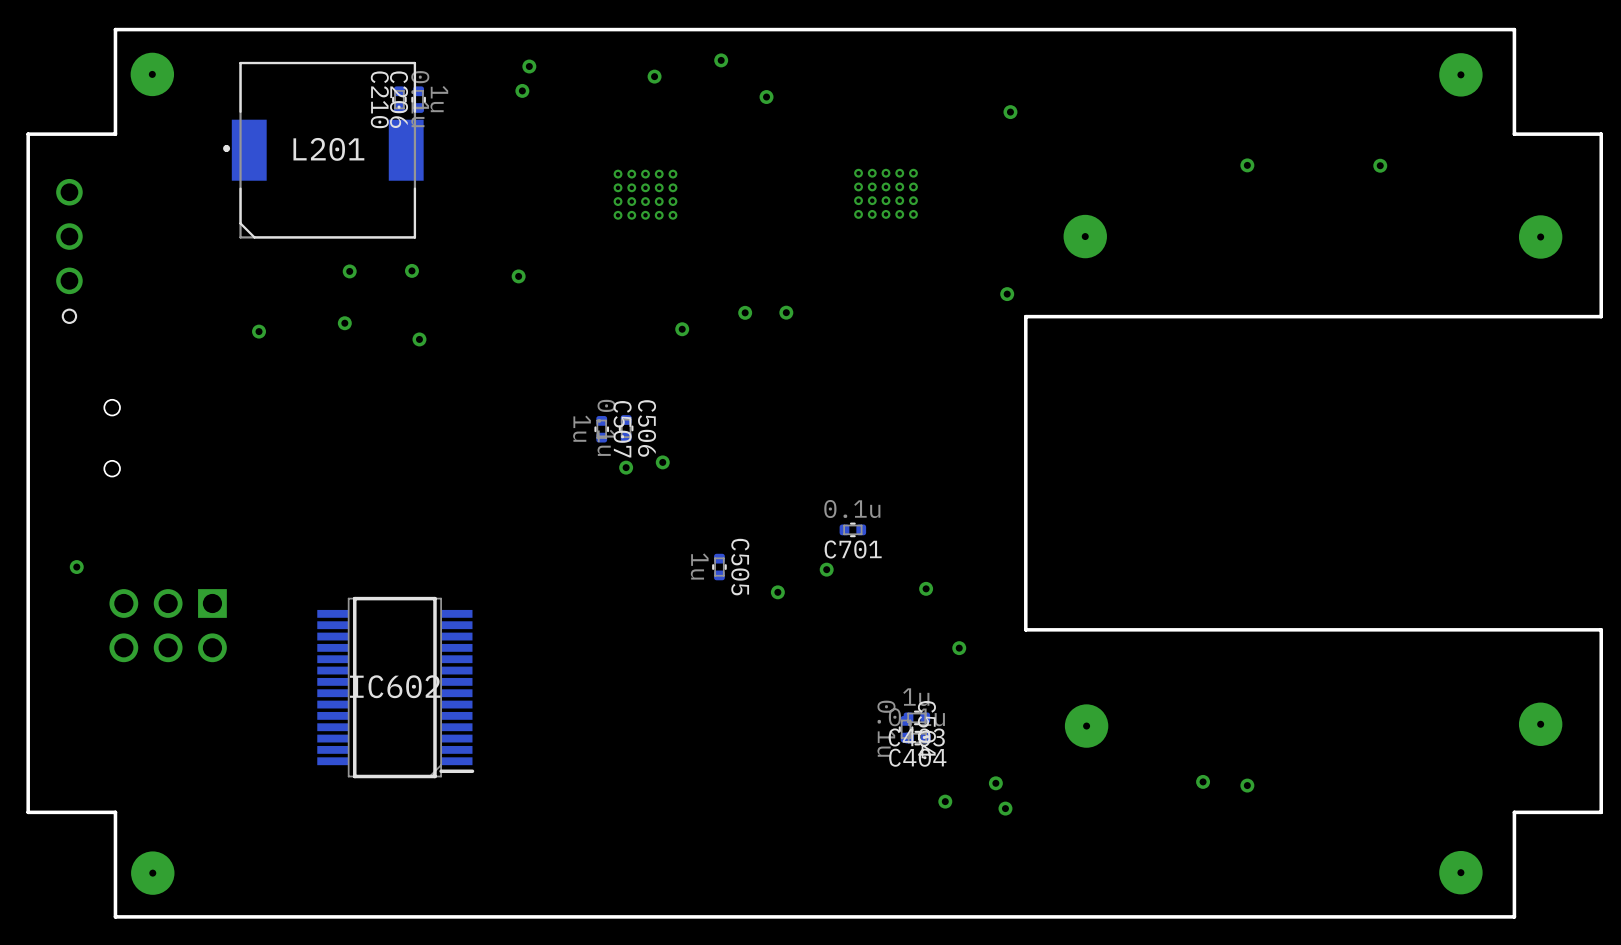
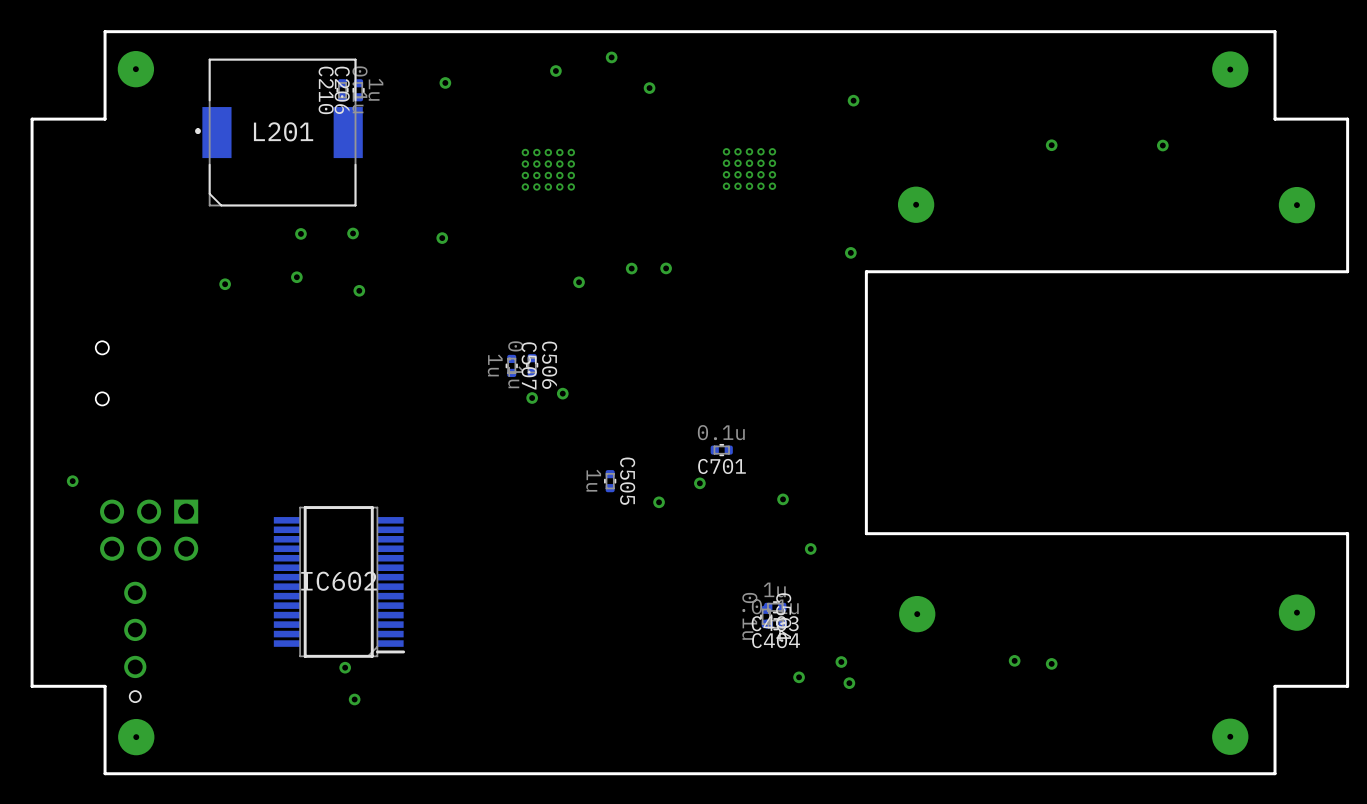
via: (529, 66) -> none
part: (69, 251) -> none
part: none -> (135, 642)
via: none -> (345, 667)
via: none -> (354, 699)

